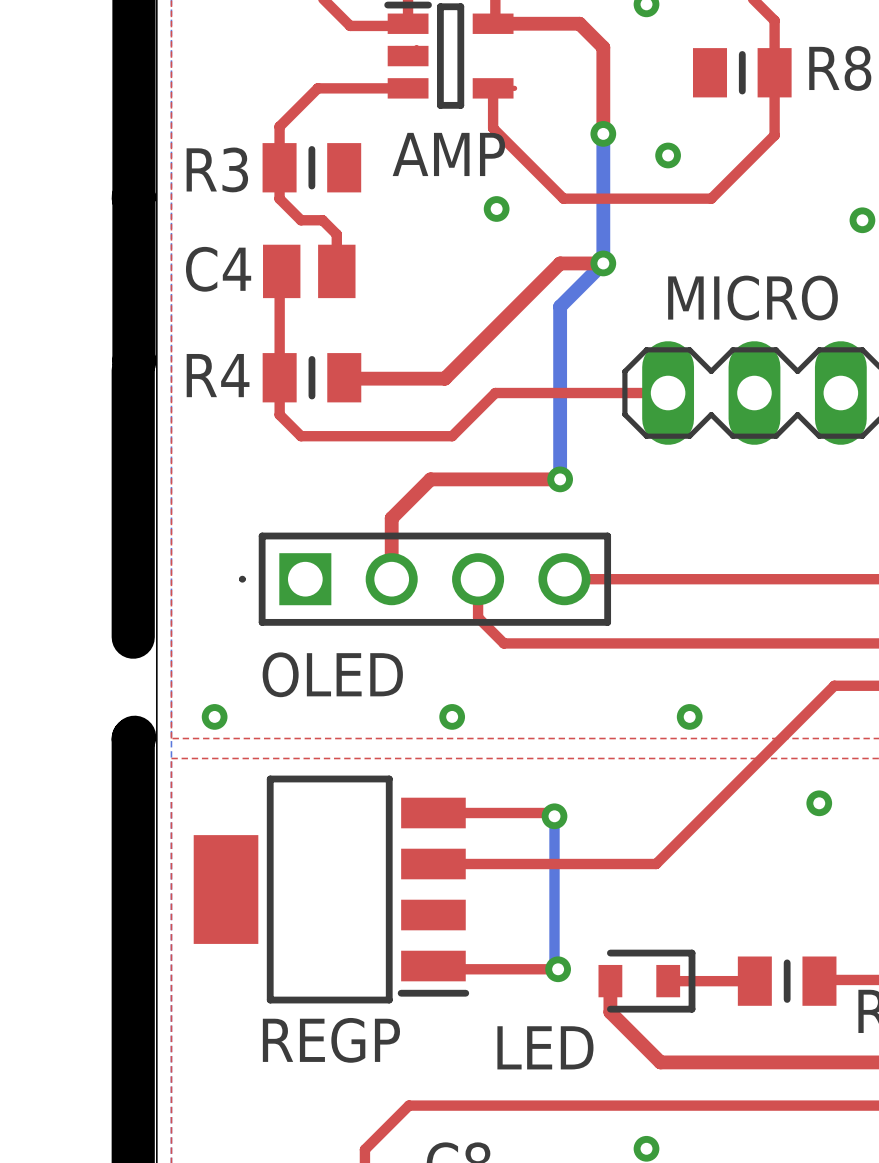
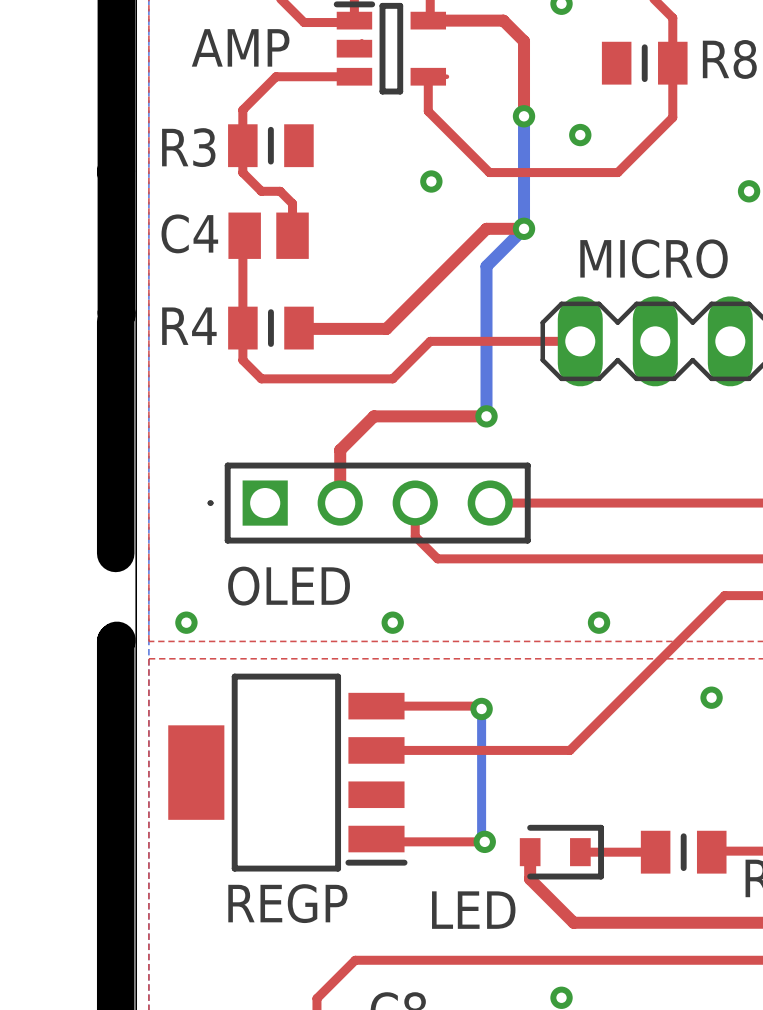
AMP name position: AMP (448, 154) -> AMP (240, 47)

